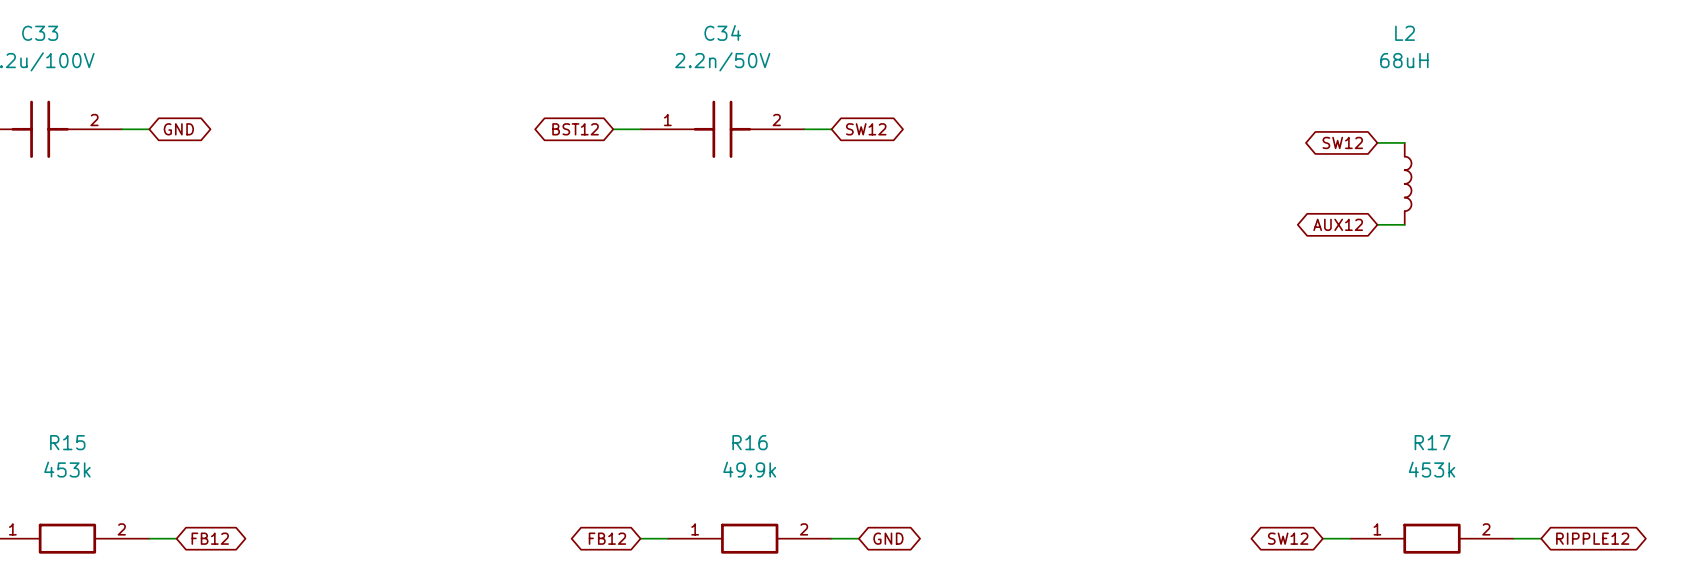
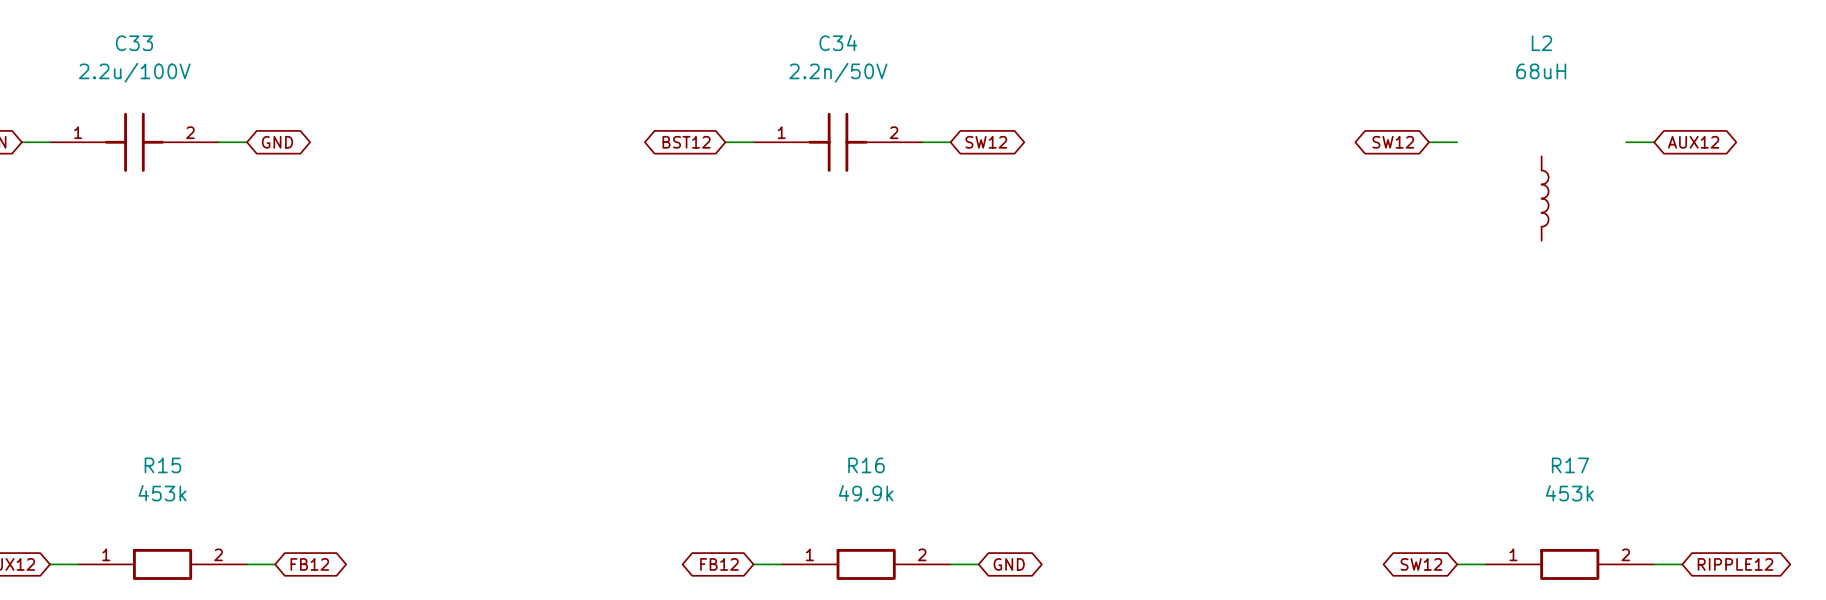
global label position: SW12 (1342, 142) -> SW12 (1393, 142)
wire: (1377, 142) (1404, 142) -> (1429, 142) (1457, 142)
global label rotation: 0° (1338, 224) -> 180° (1693, 142)
global label position: AUX12 (1338, 224) -> AUX12 (1693, 142)
wire: (1377, 224) (1404, 224) -> (1626, 142) (1654, 142)

